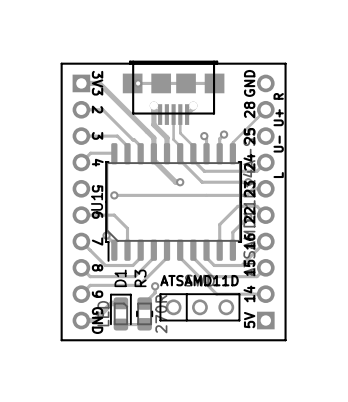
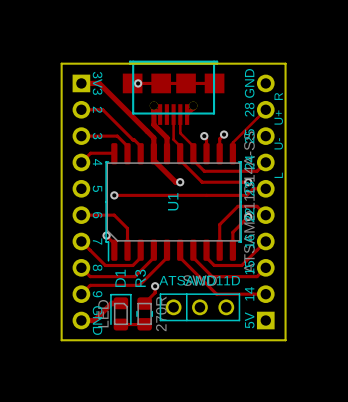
U1 name position: U1 (96, 201) -> U1 (173, 201)

